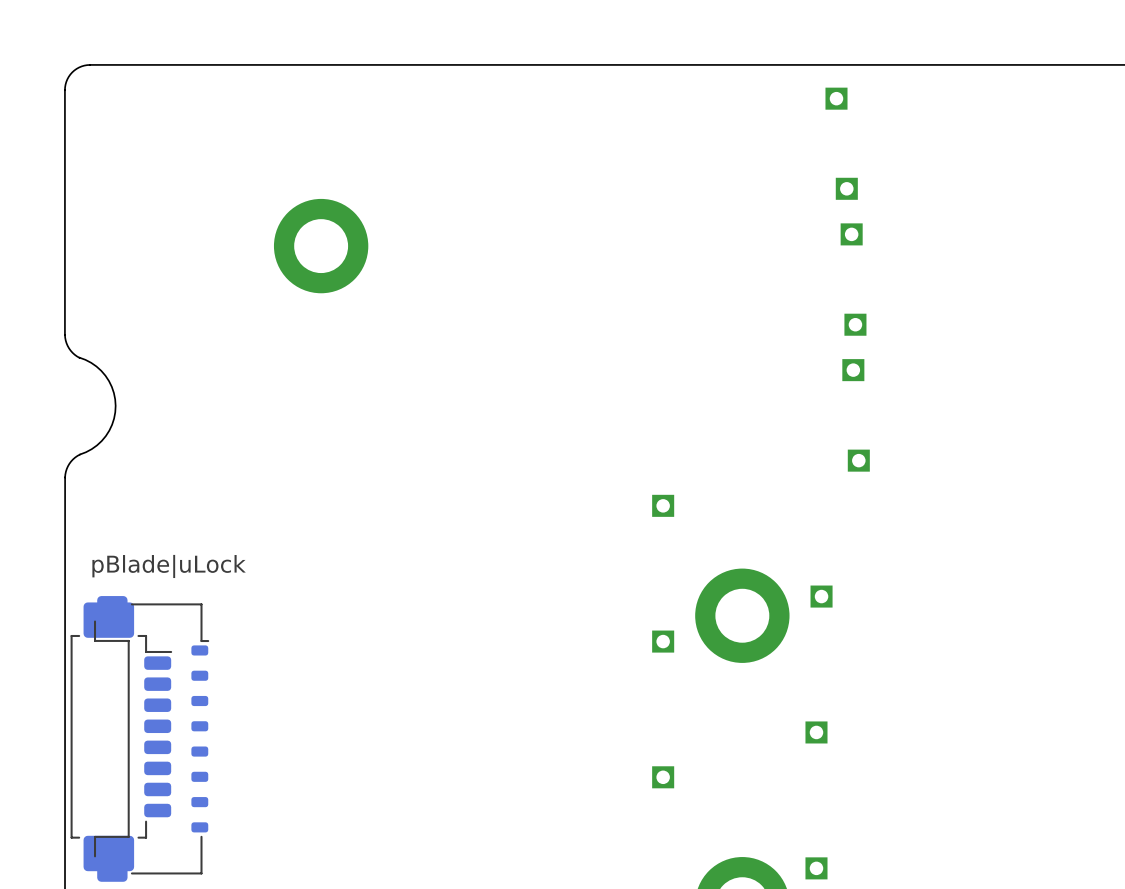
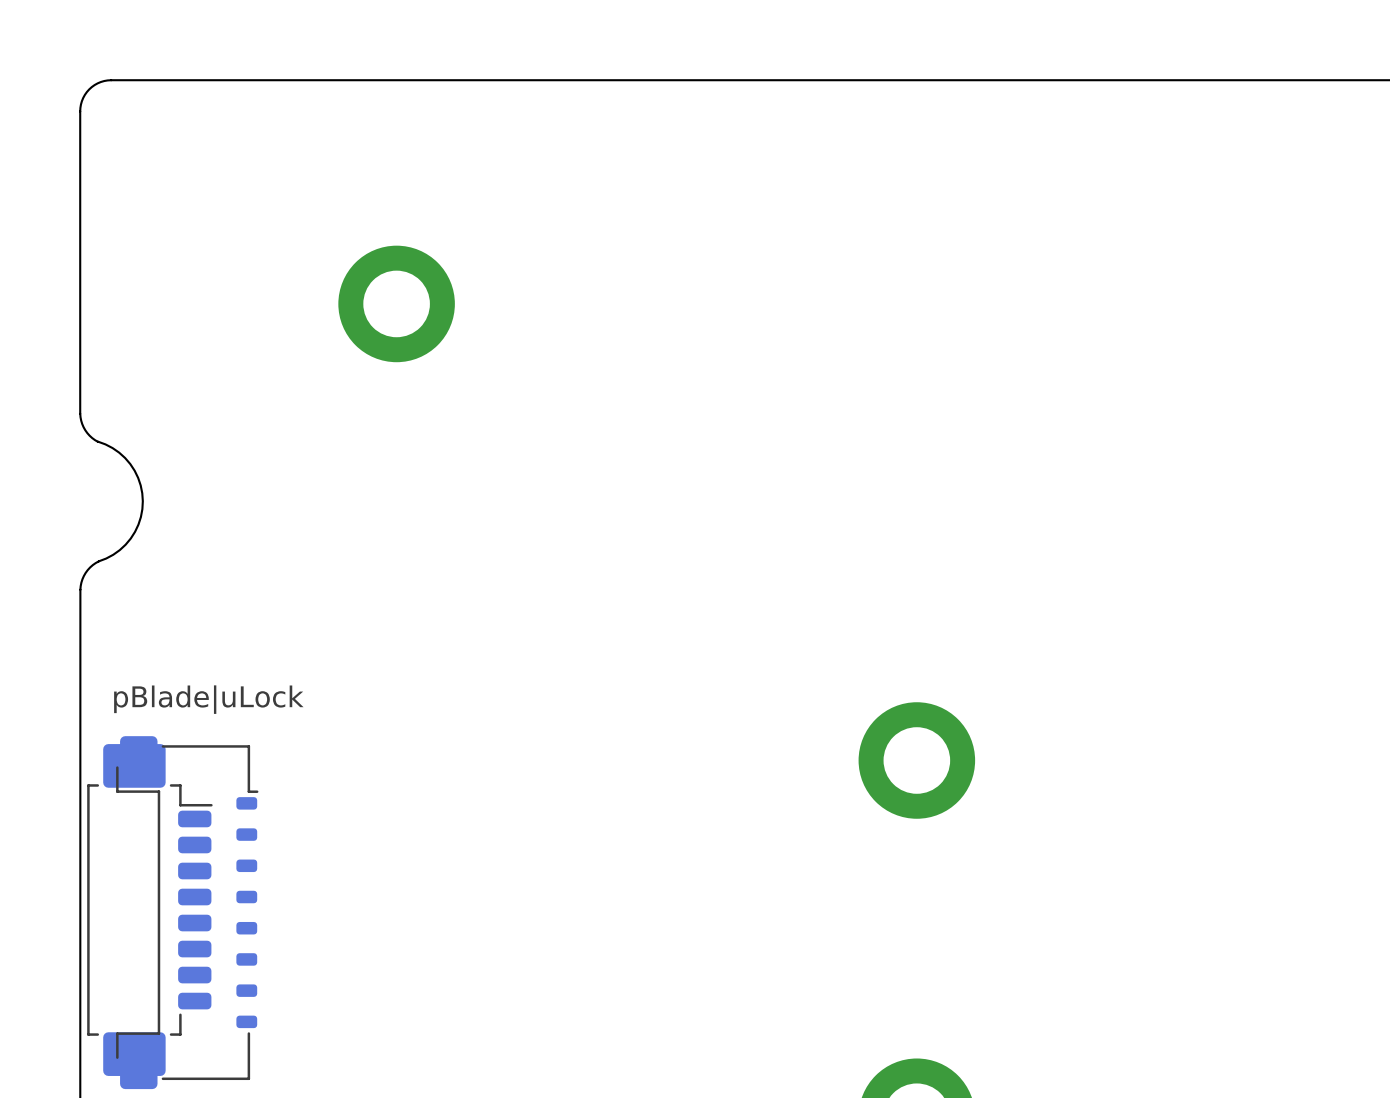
part: (836, 98) -> none
part: (846, 188) -> none
part: (851, 234) -> none
part: (855, 324) -> none
part: (853, 370) -> none
part: (858, 460) -> none
part: (663, 505) -> none
part: (821, 596) -> none
part: (663, 641) -> none
part: (816, 732) -> none
part: (663, 777) -> none
part: (816, 868) -> none

